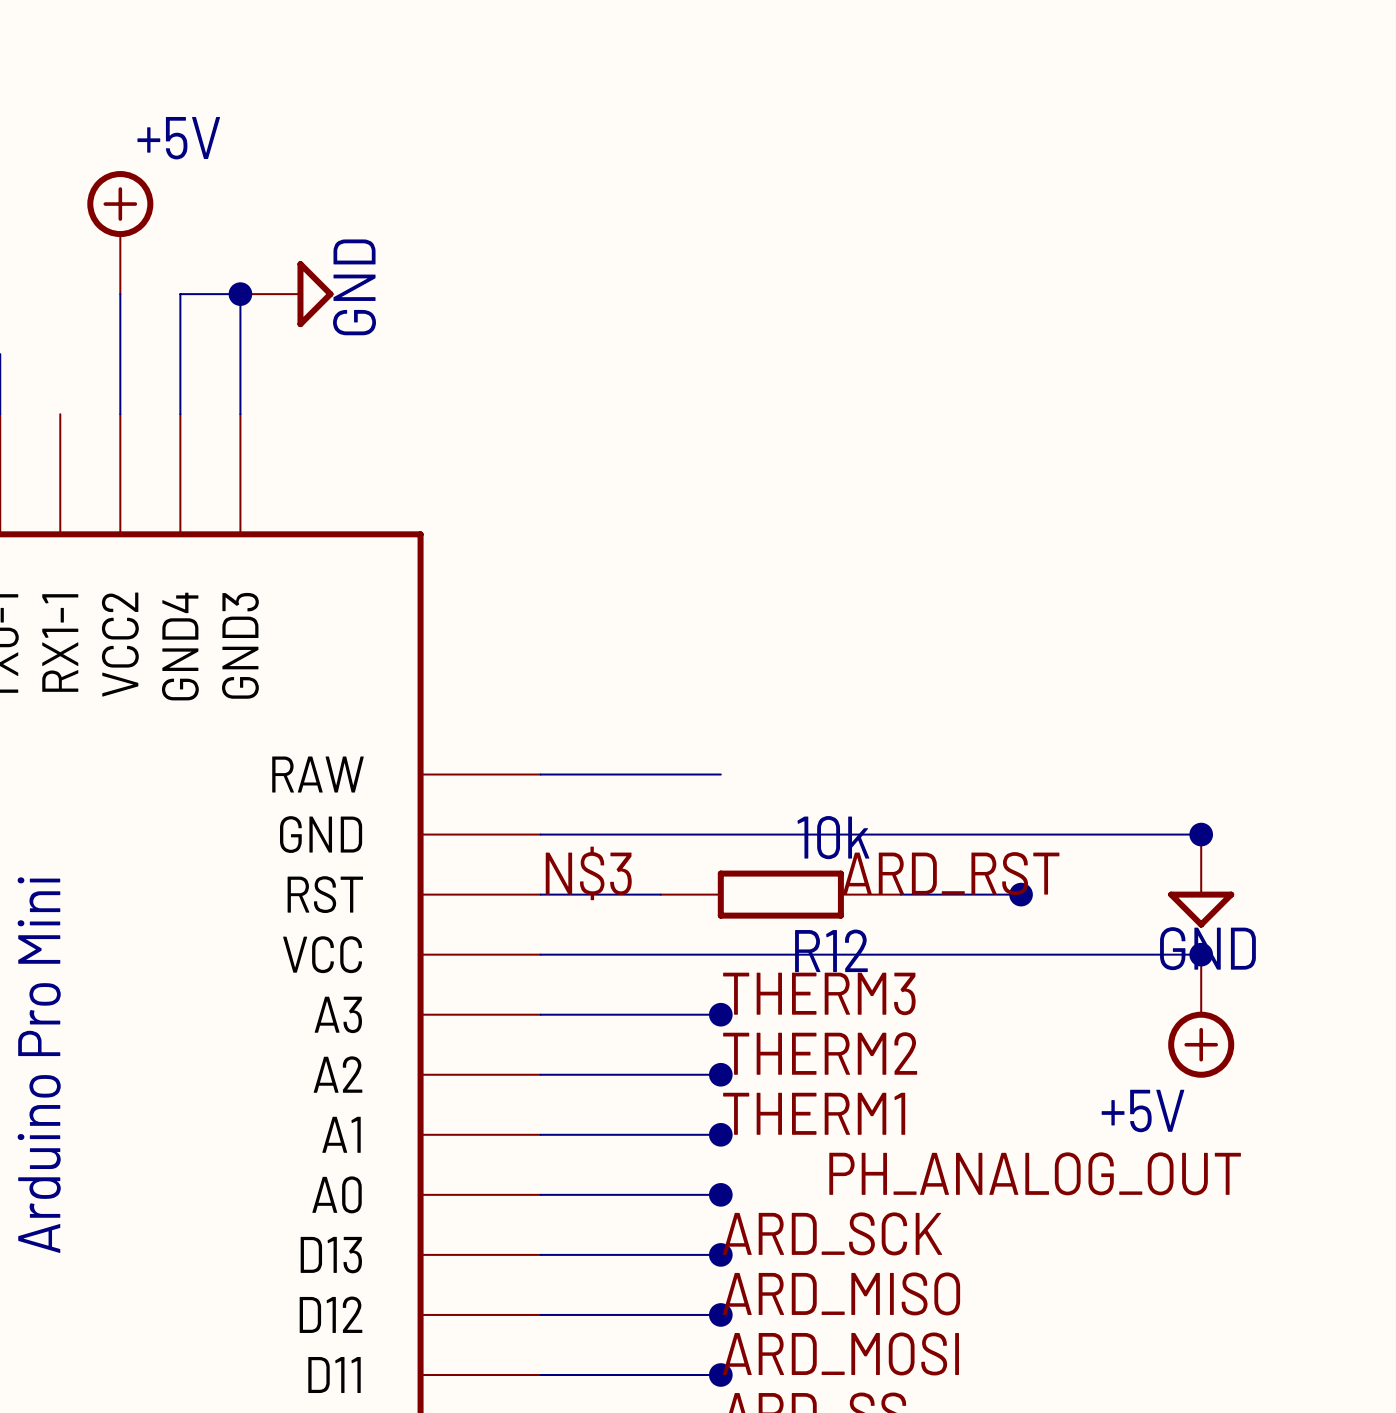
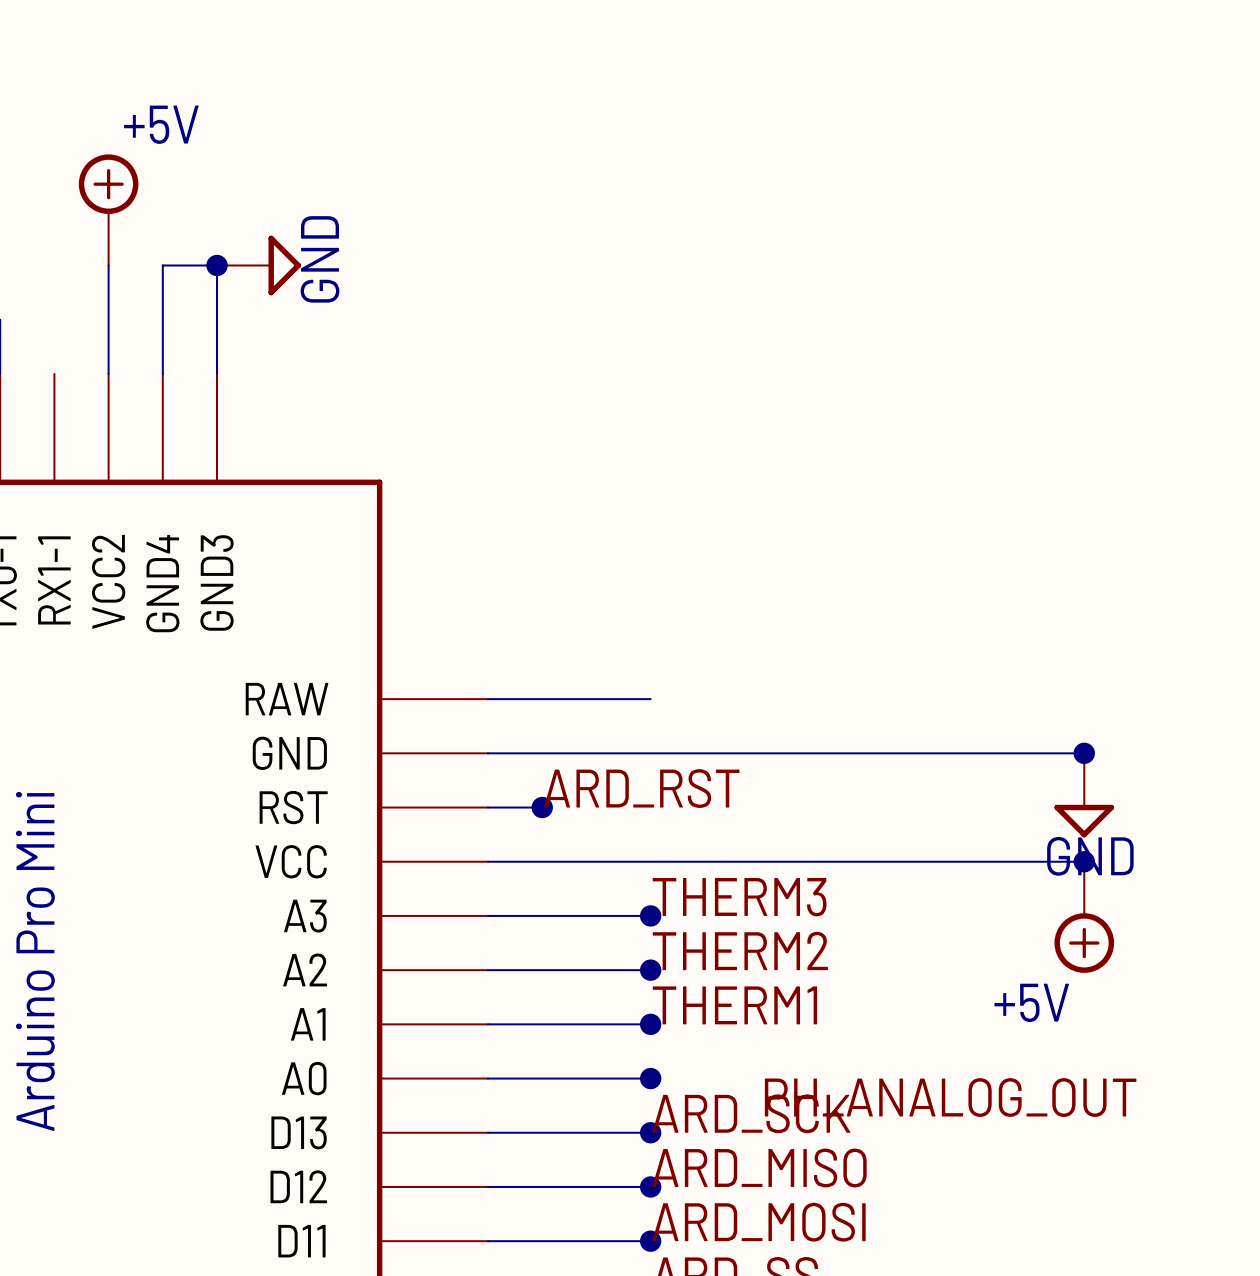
label: N$3 (588, 873) -> none
label position: ARD_RST (951, 873) -> ARD_RST (641, 788)
wire: (600, 894) (660, 894) -> none
junction: none -> (542, 807)
R12: 10k (780, 894) -> none
wire: (900, 894) (1021, 894) -> none
junction: (1021, 894) -> none
label position: PH_ANALOG_OUT (1035, 1173) -> PH_ANALOG_OUT (950, 1097)

